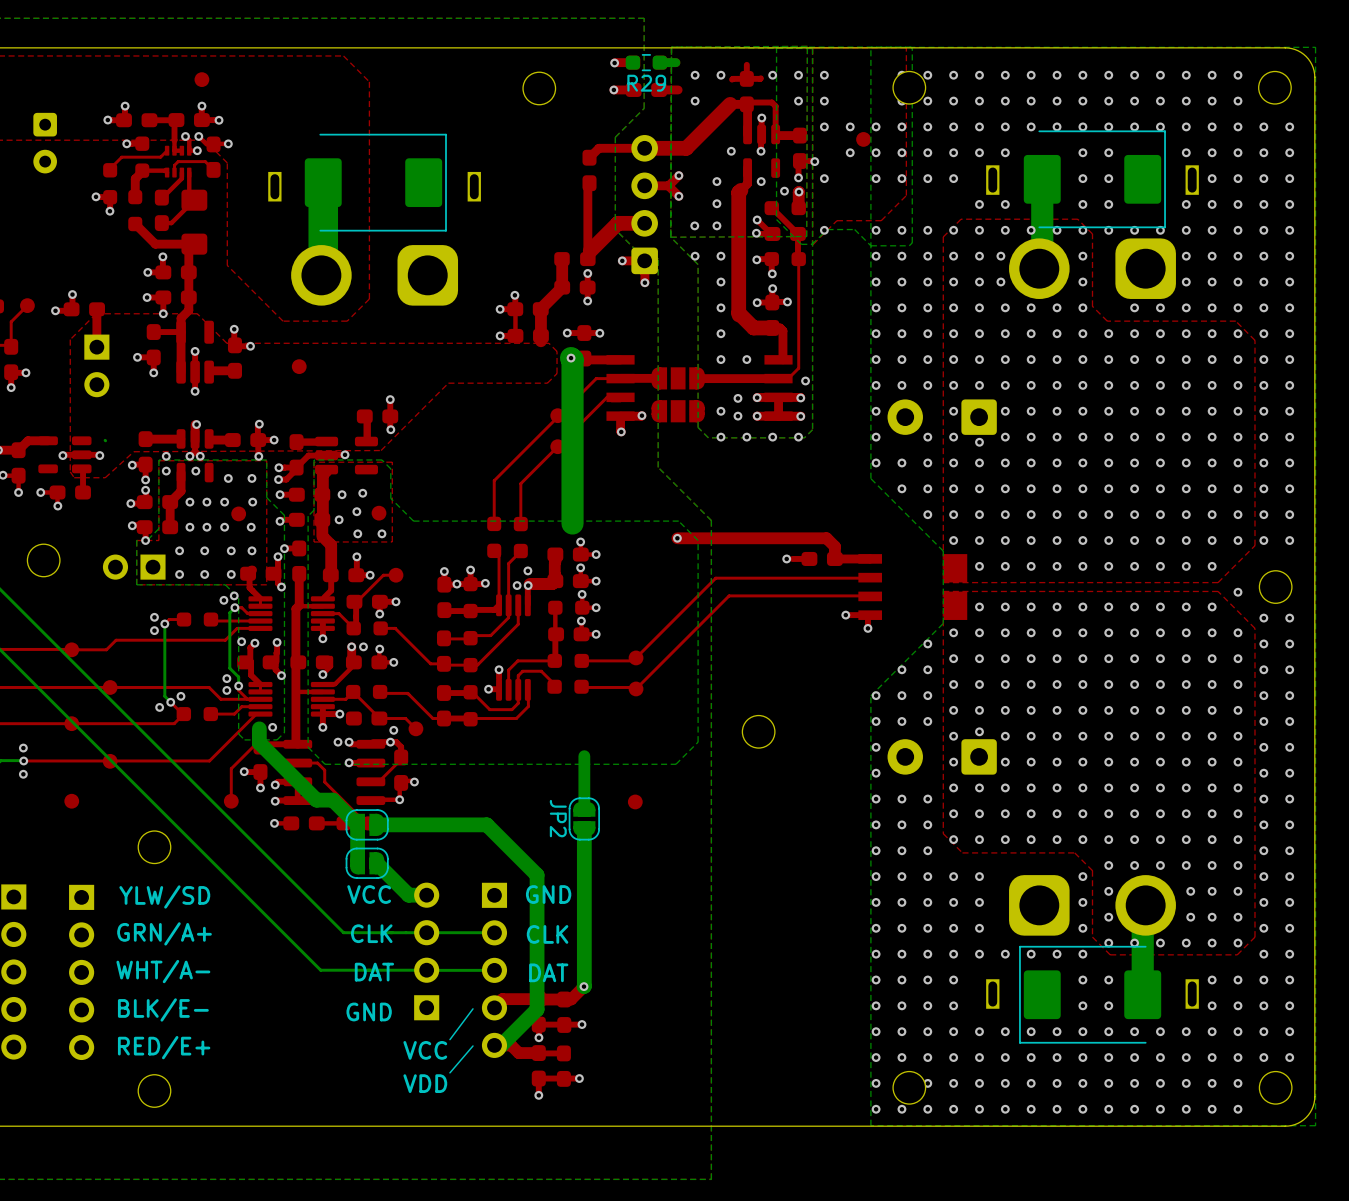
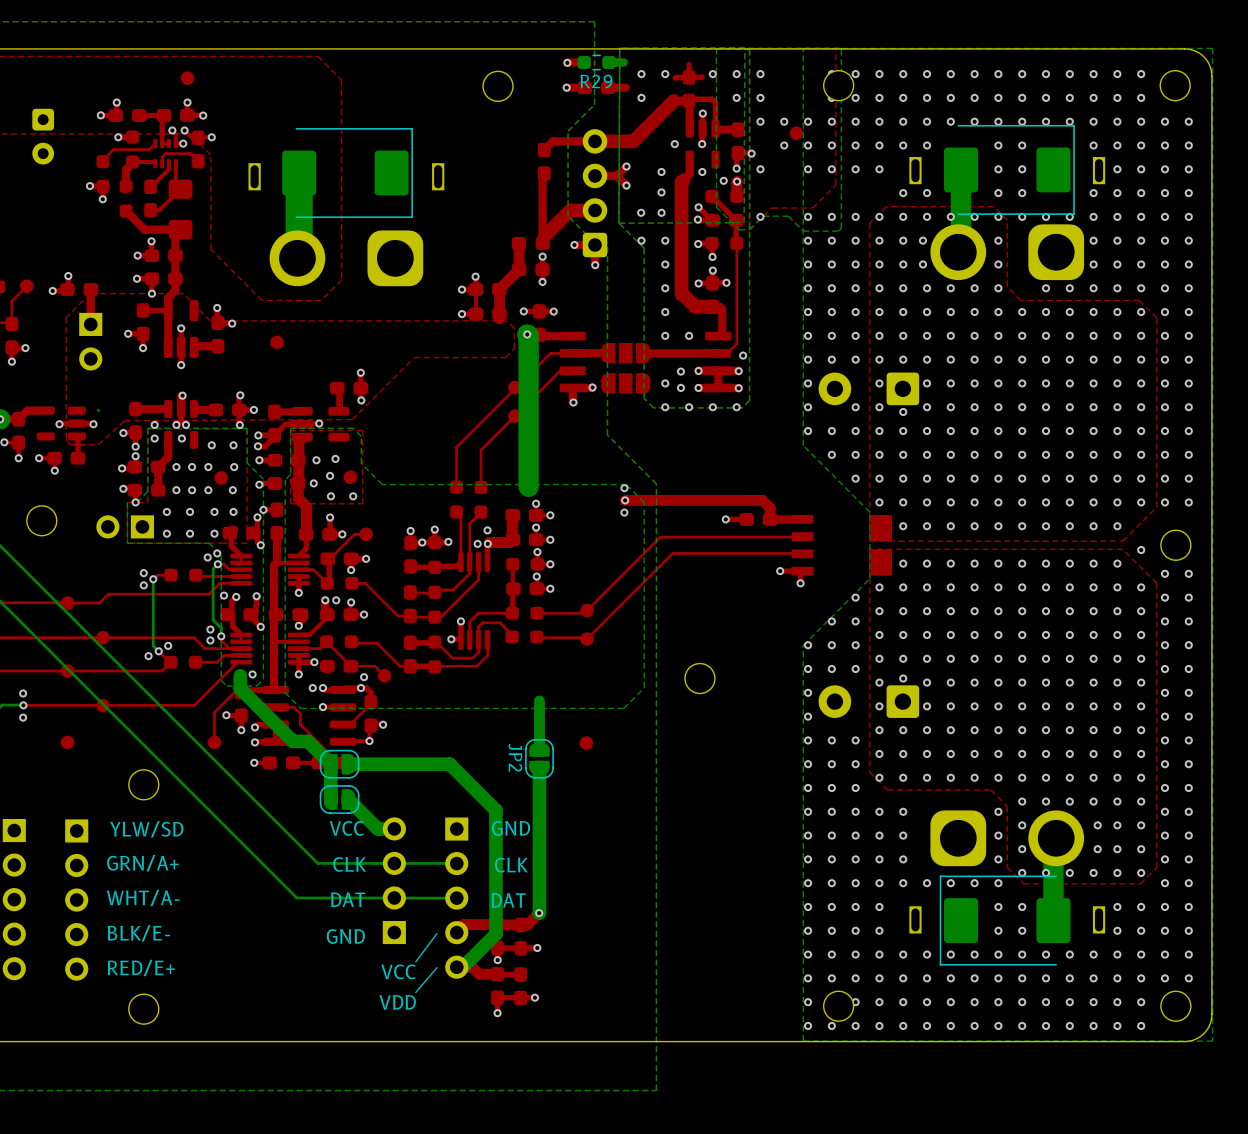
via: none -> (624, 488)
via: none -> (624, 512)

